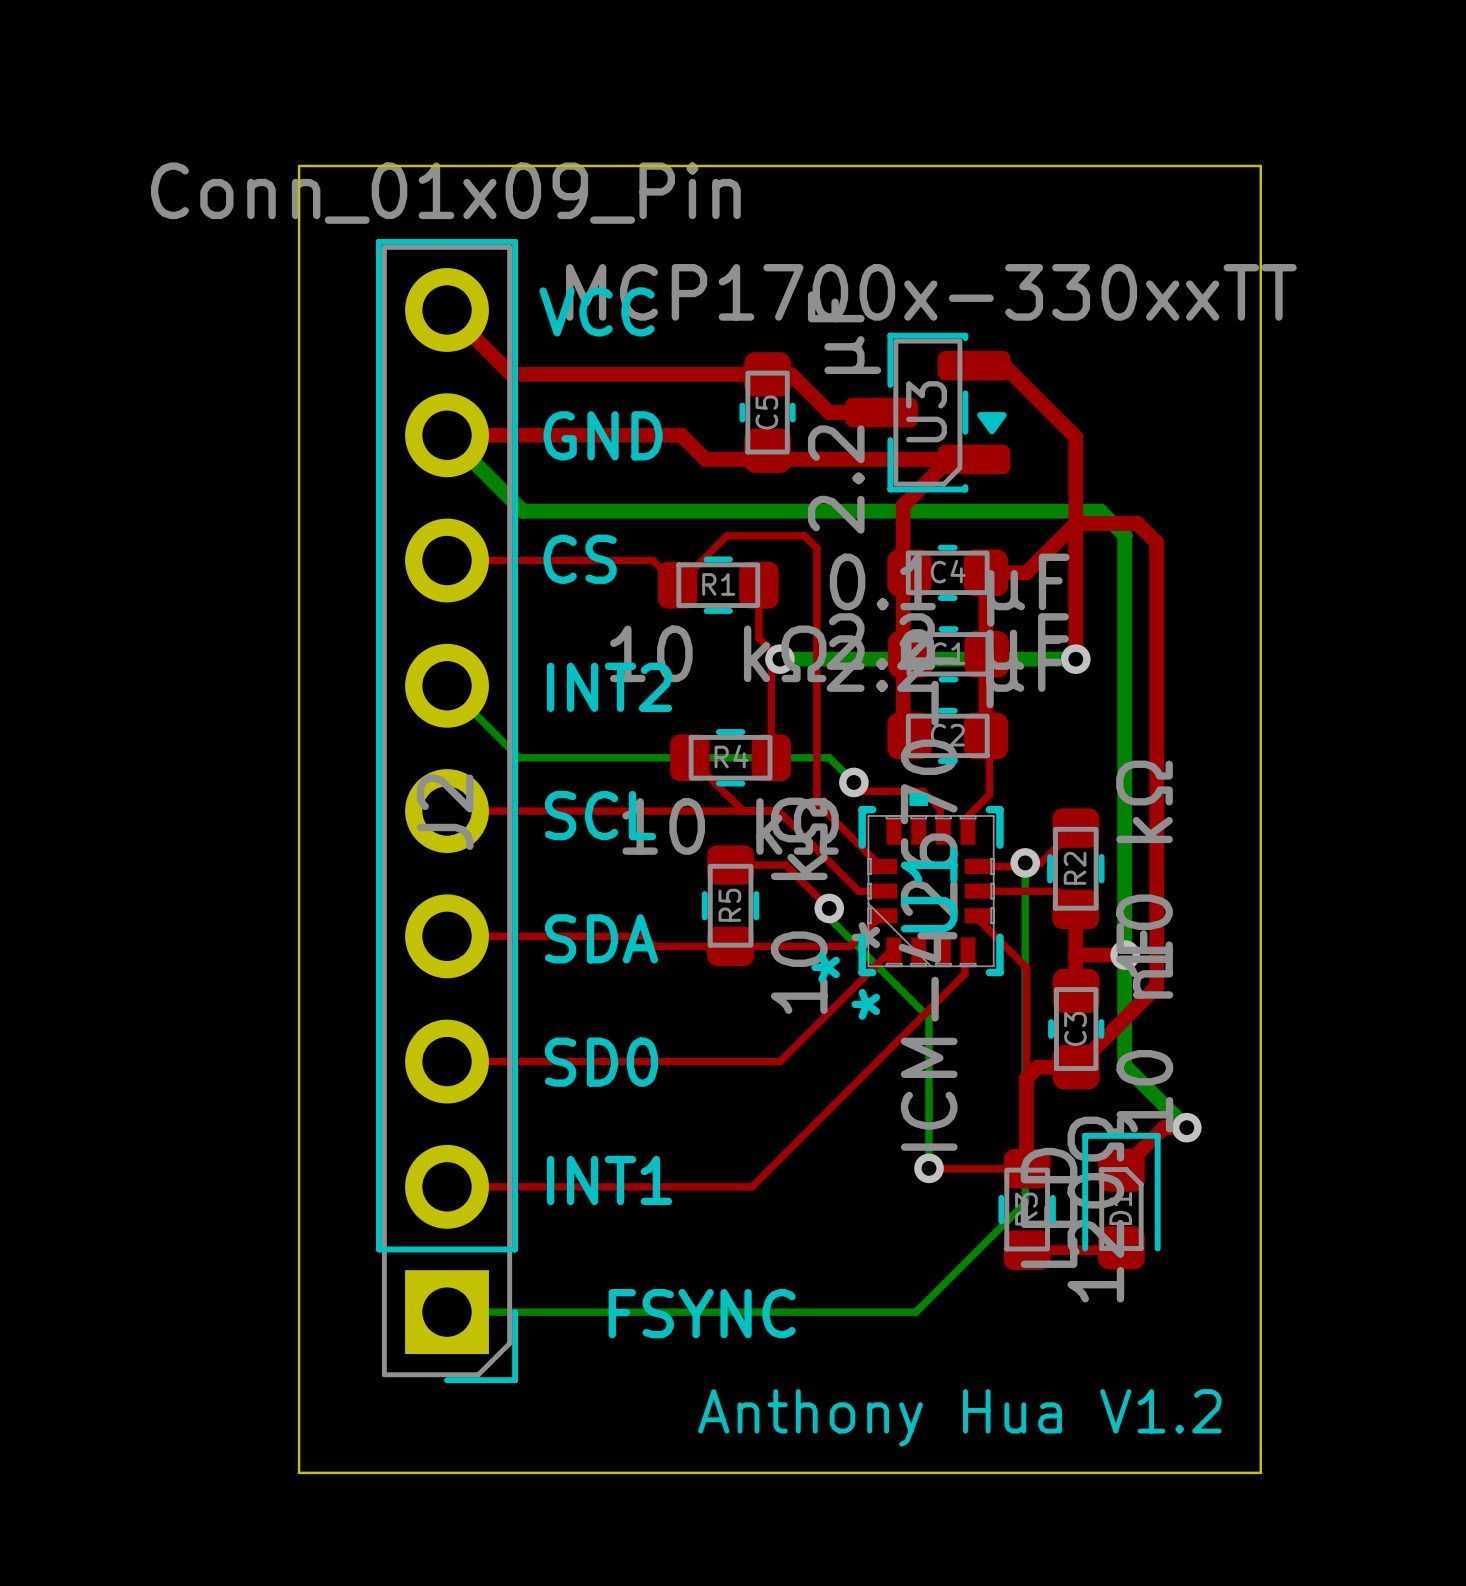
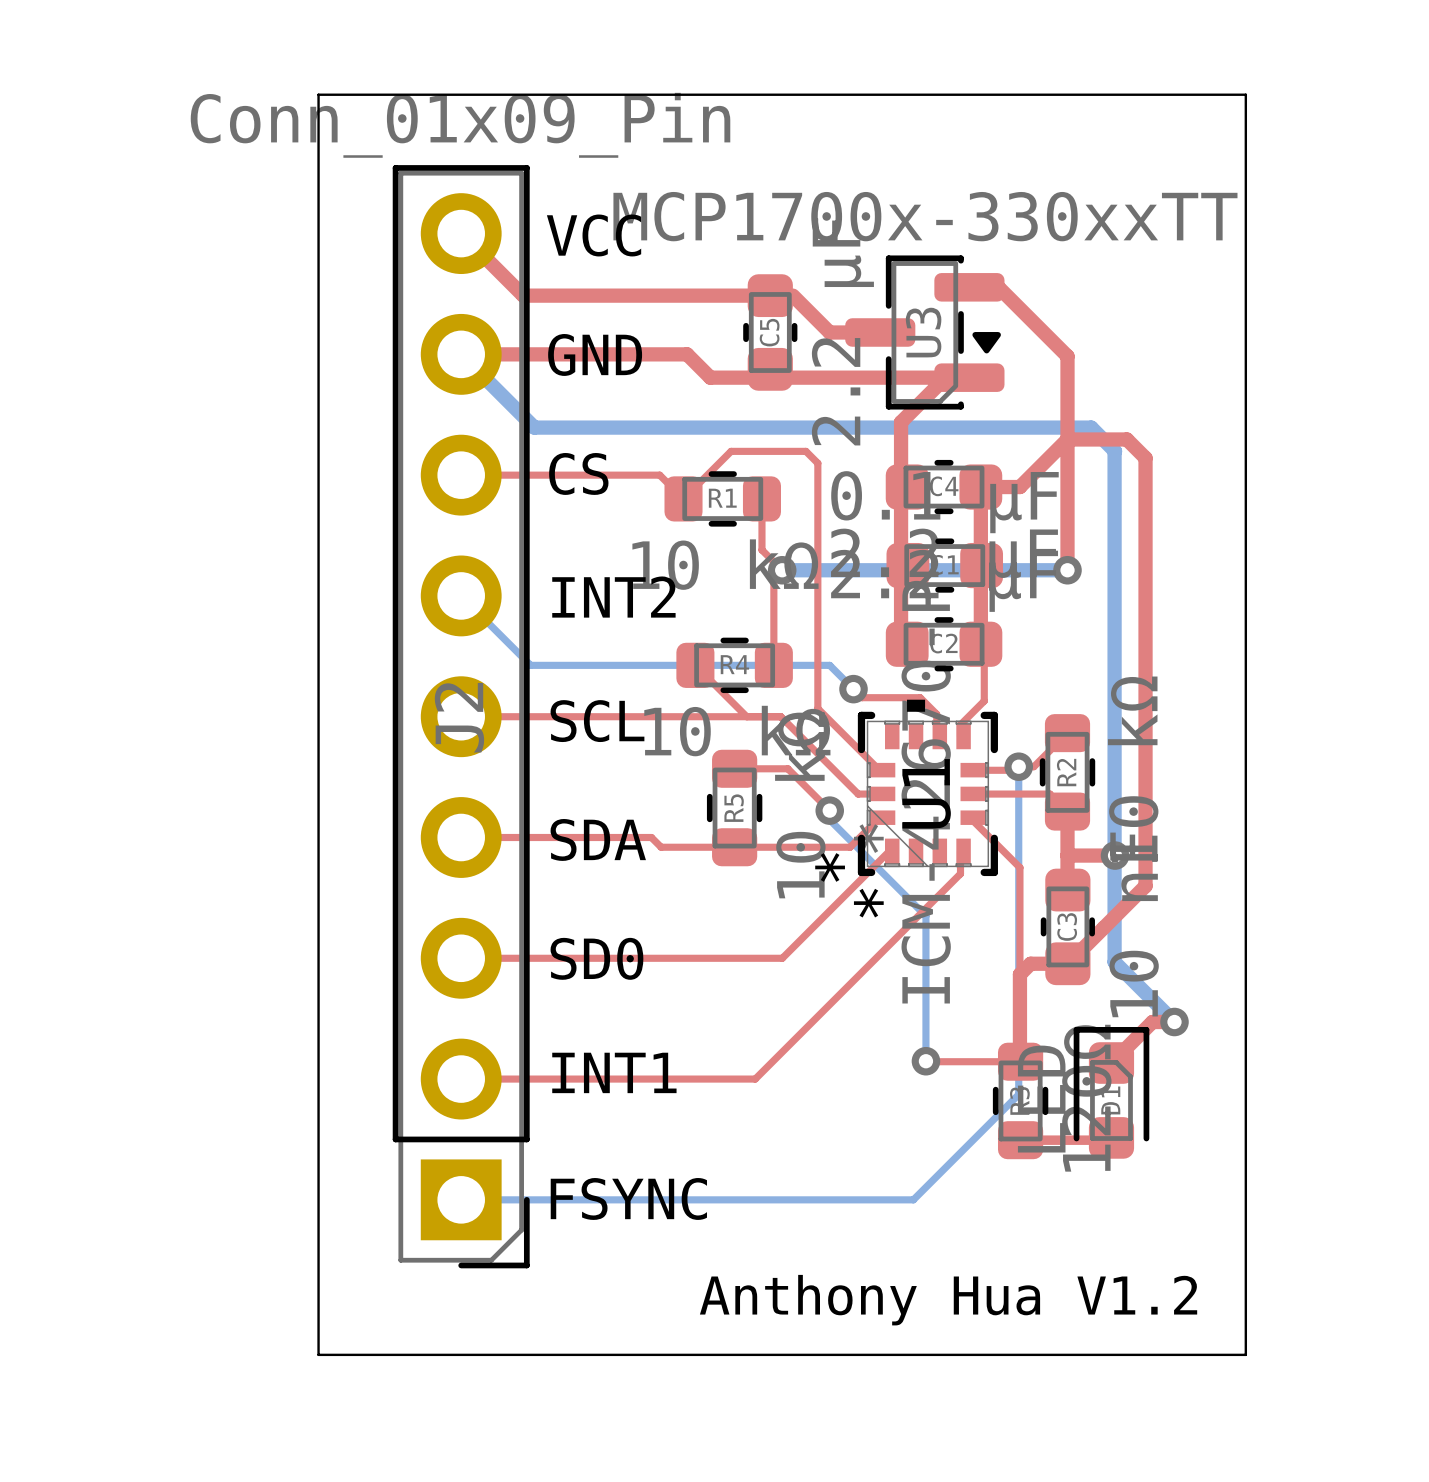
text position: FSYNC (702, 1313) -> FSYNC (628, 1198)

